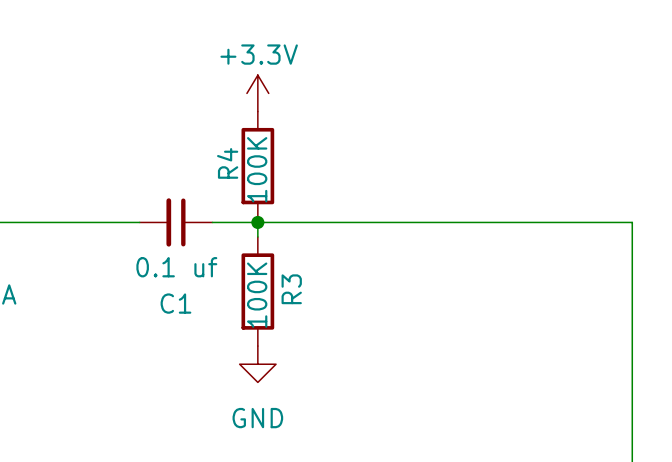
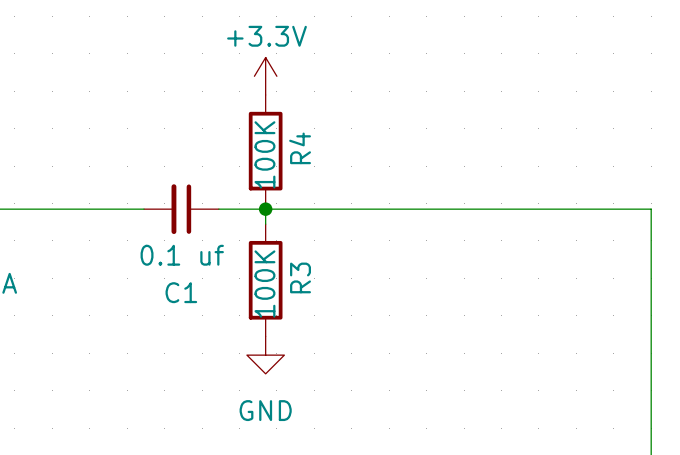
R4 name position: R4 (227, 163) -> R4 (300, 148)

